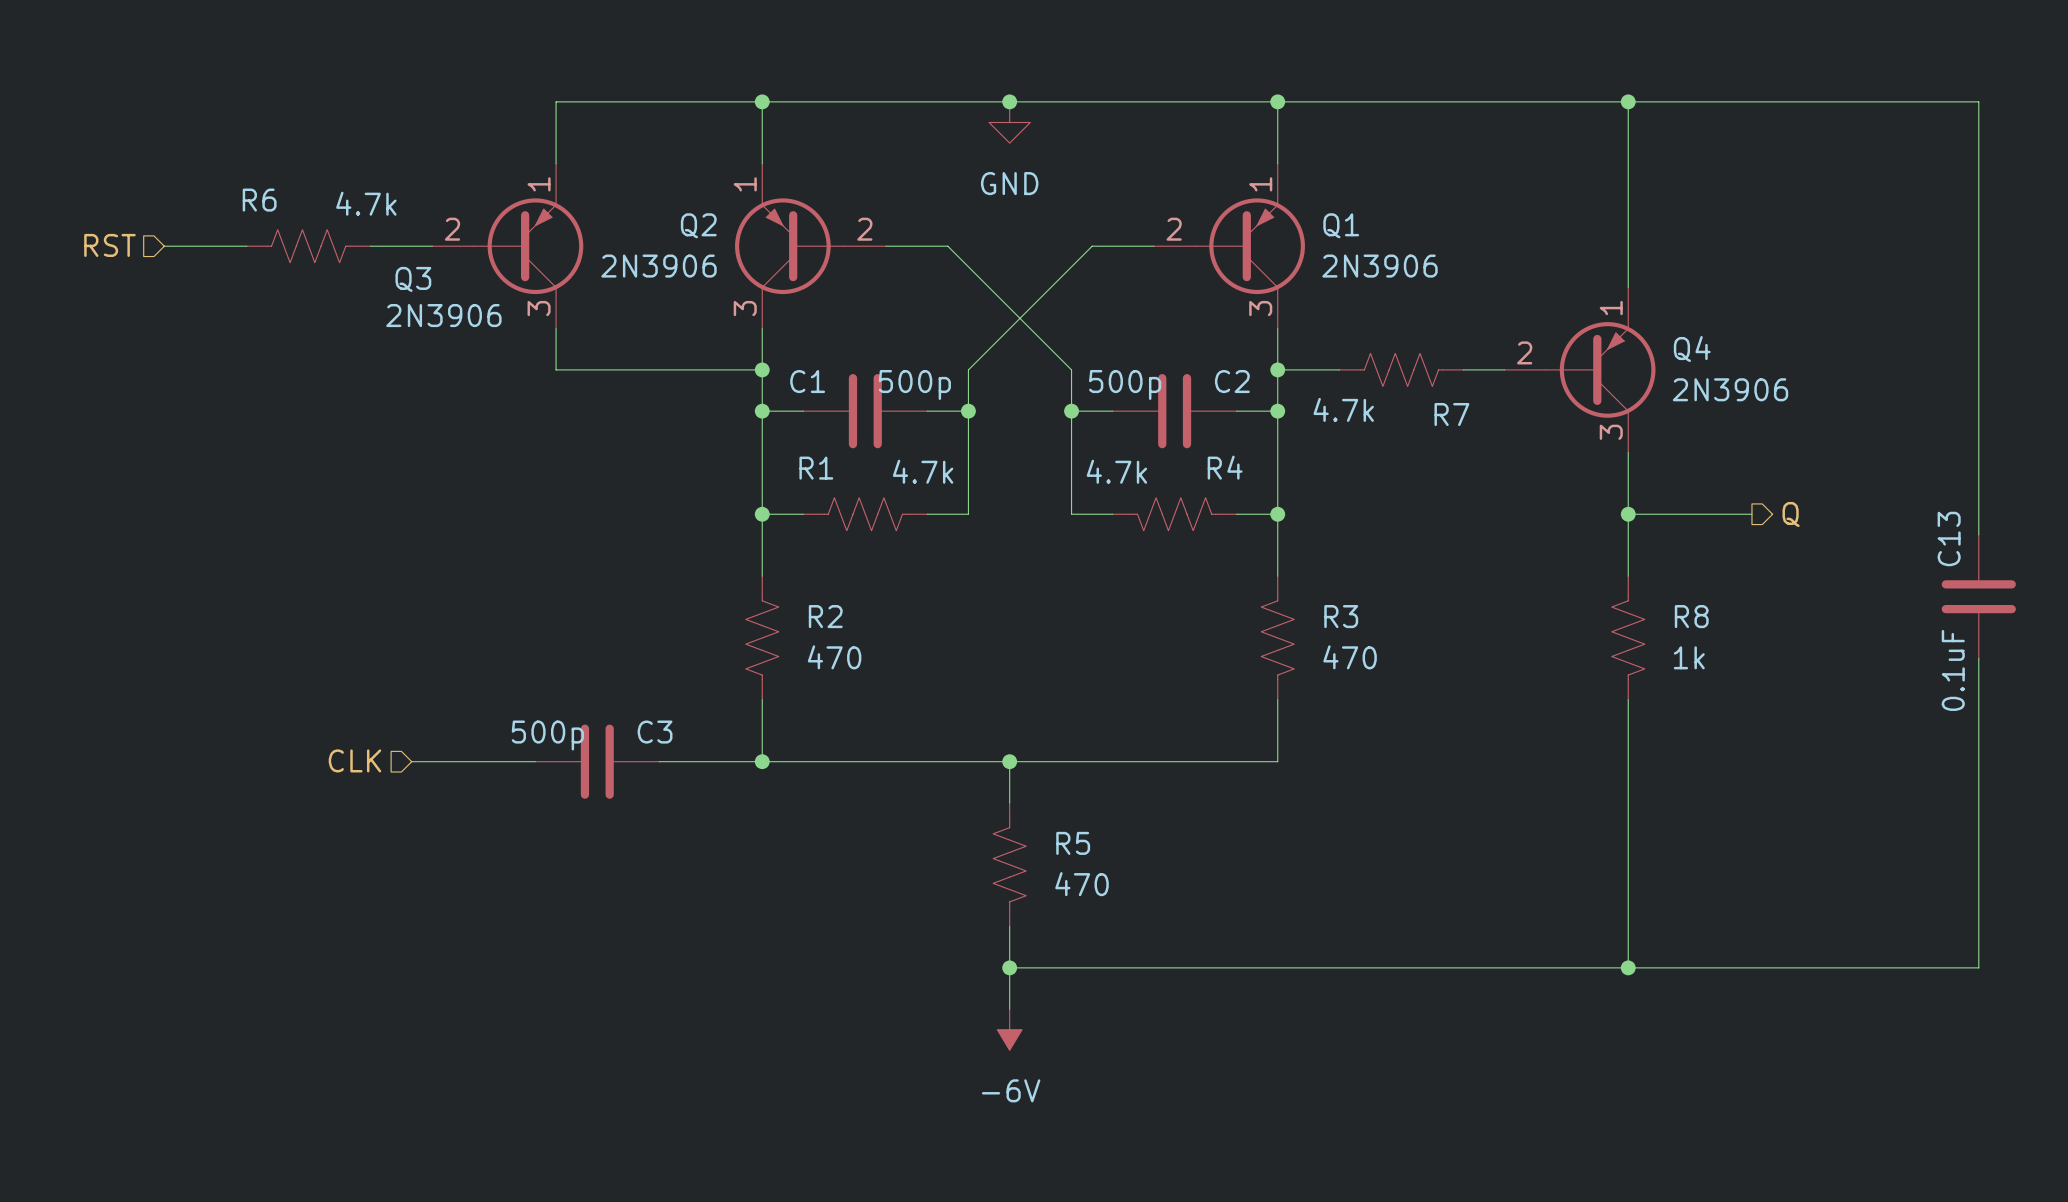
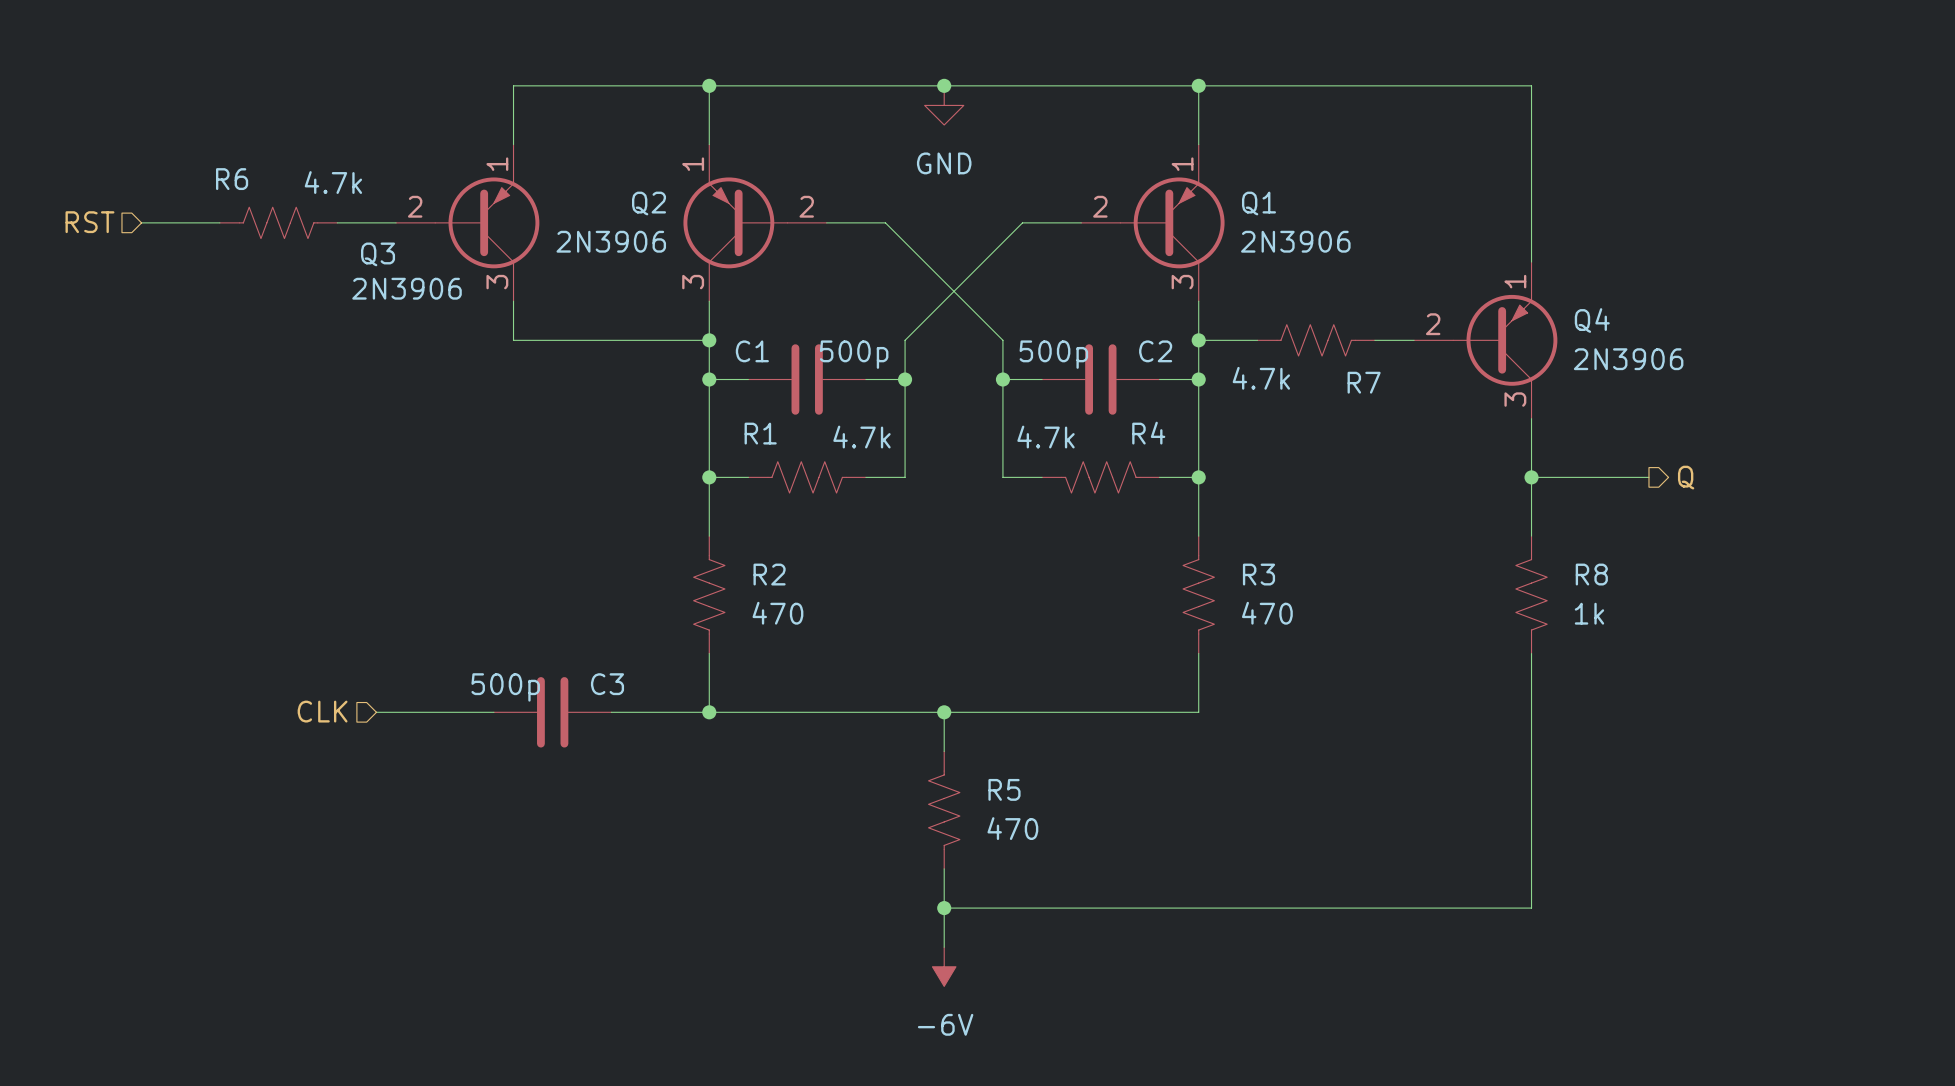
wire: (1628, 101) (1978, 101) (1978, 534) -> none
junction: (1628, 101) -> none
C13: 0.1uF (1978, 596) -> none
wire: (1978, 658) (1978, 967) (1628, 967) -> none
junction: (1628, 967) -> none

